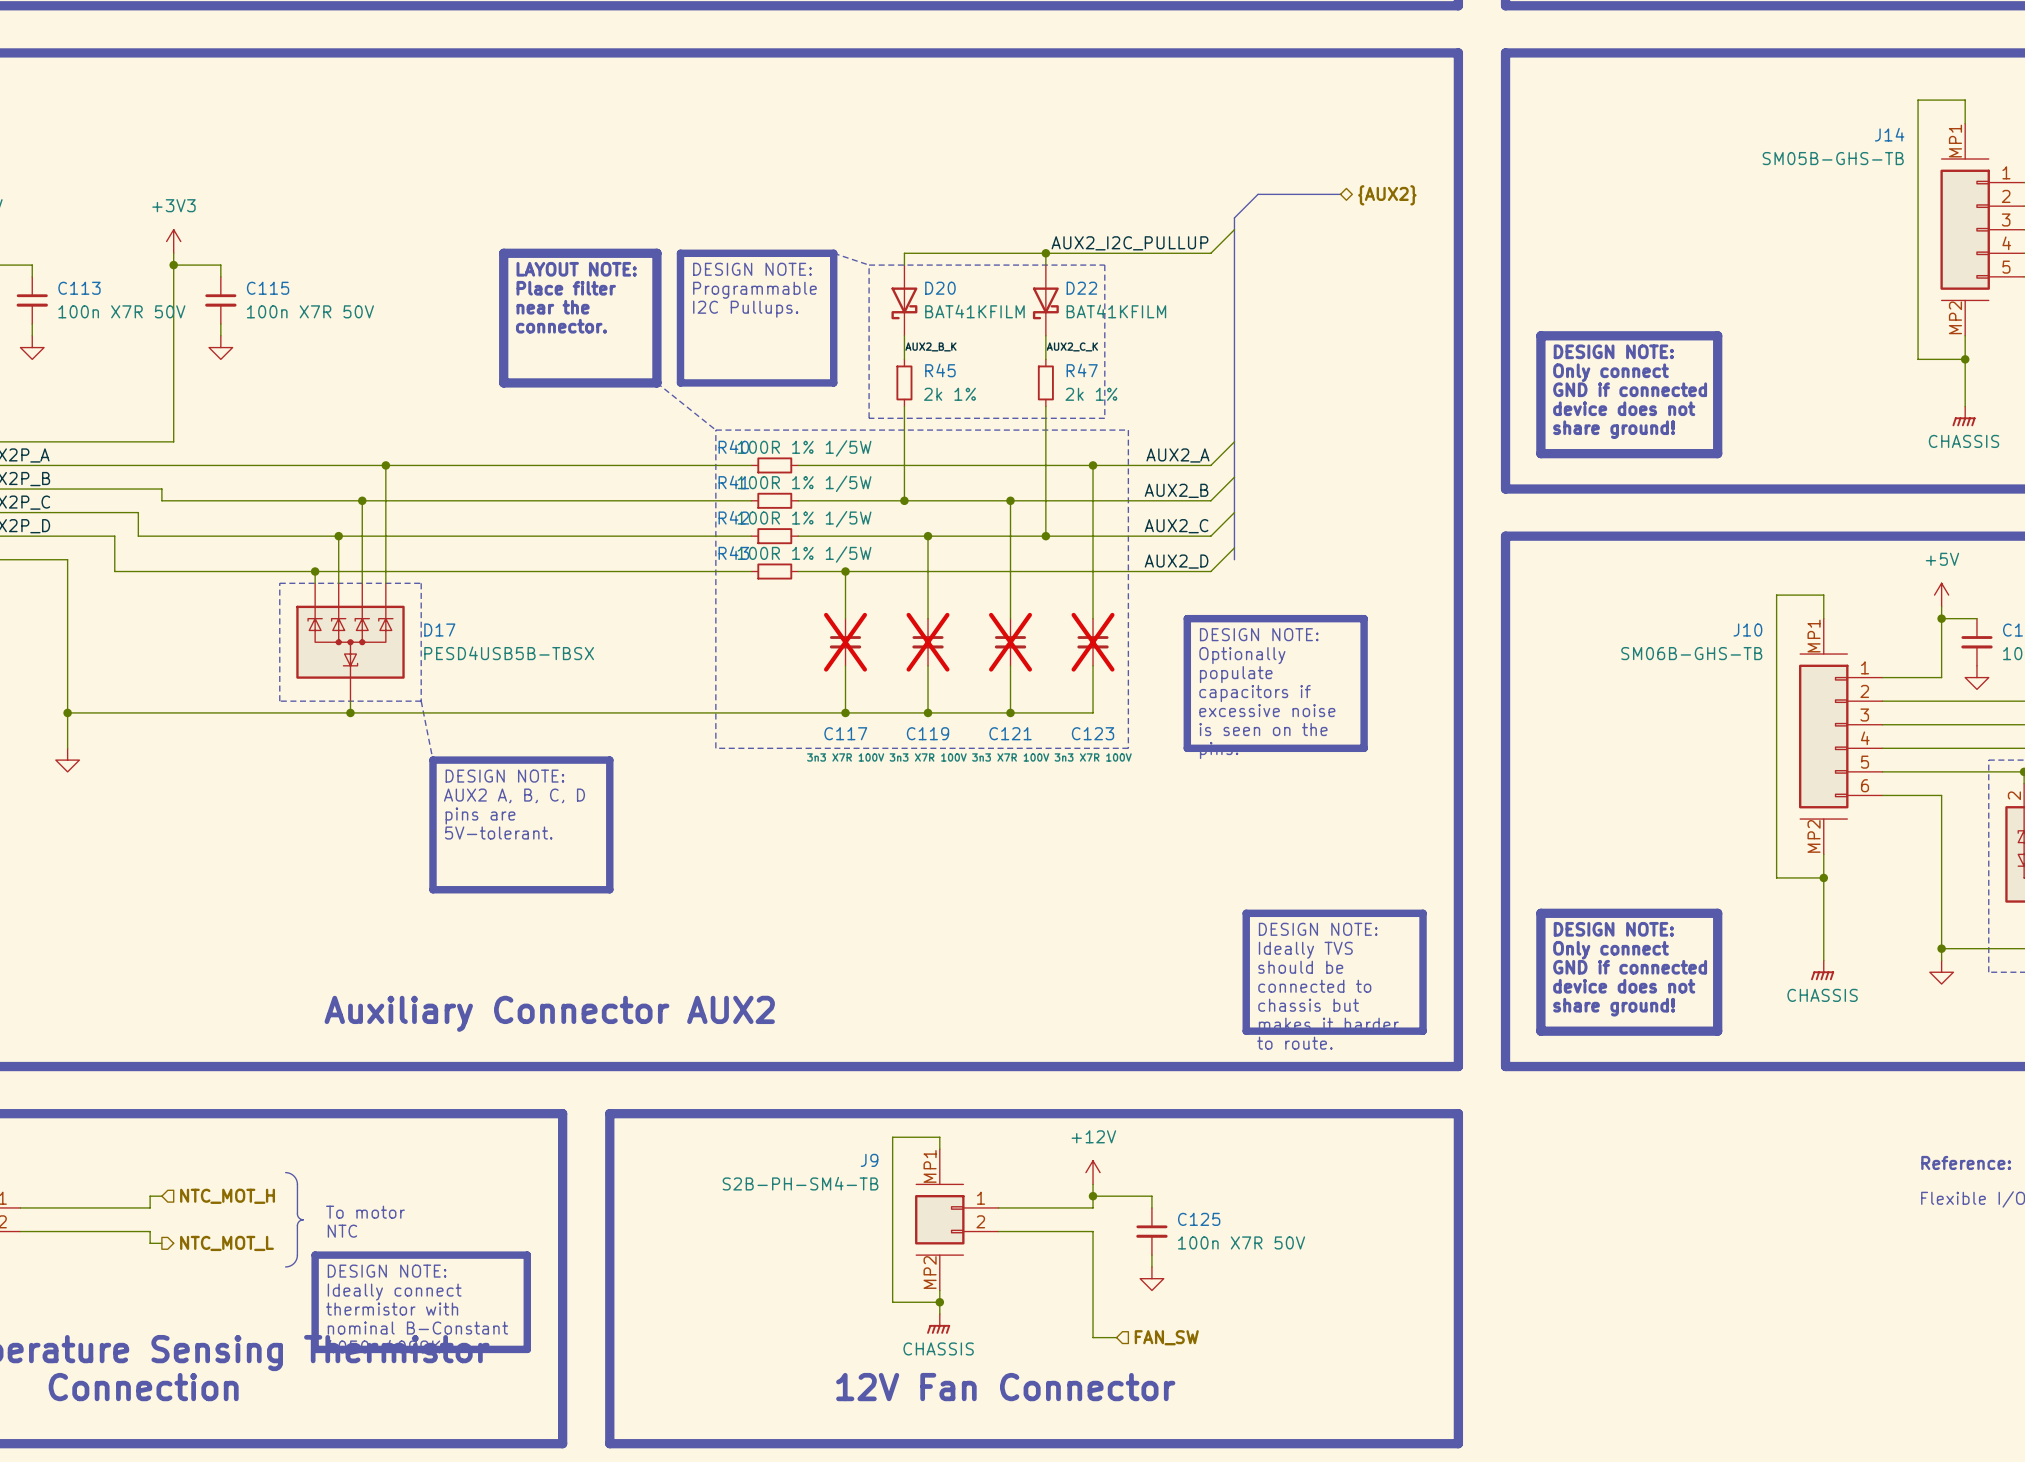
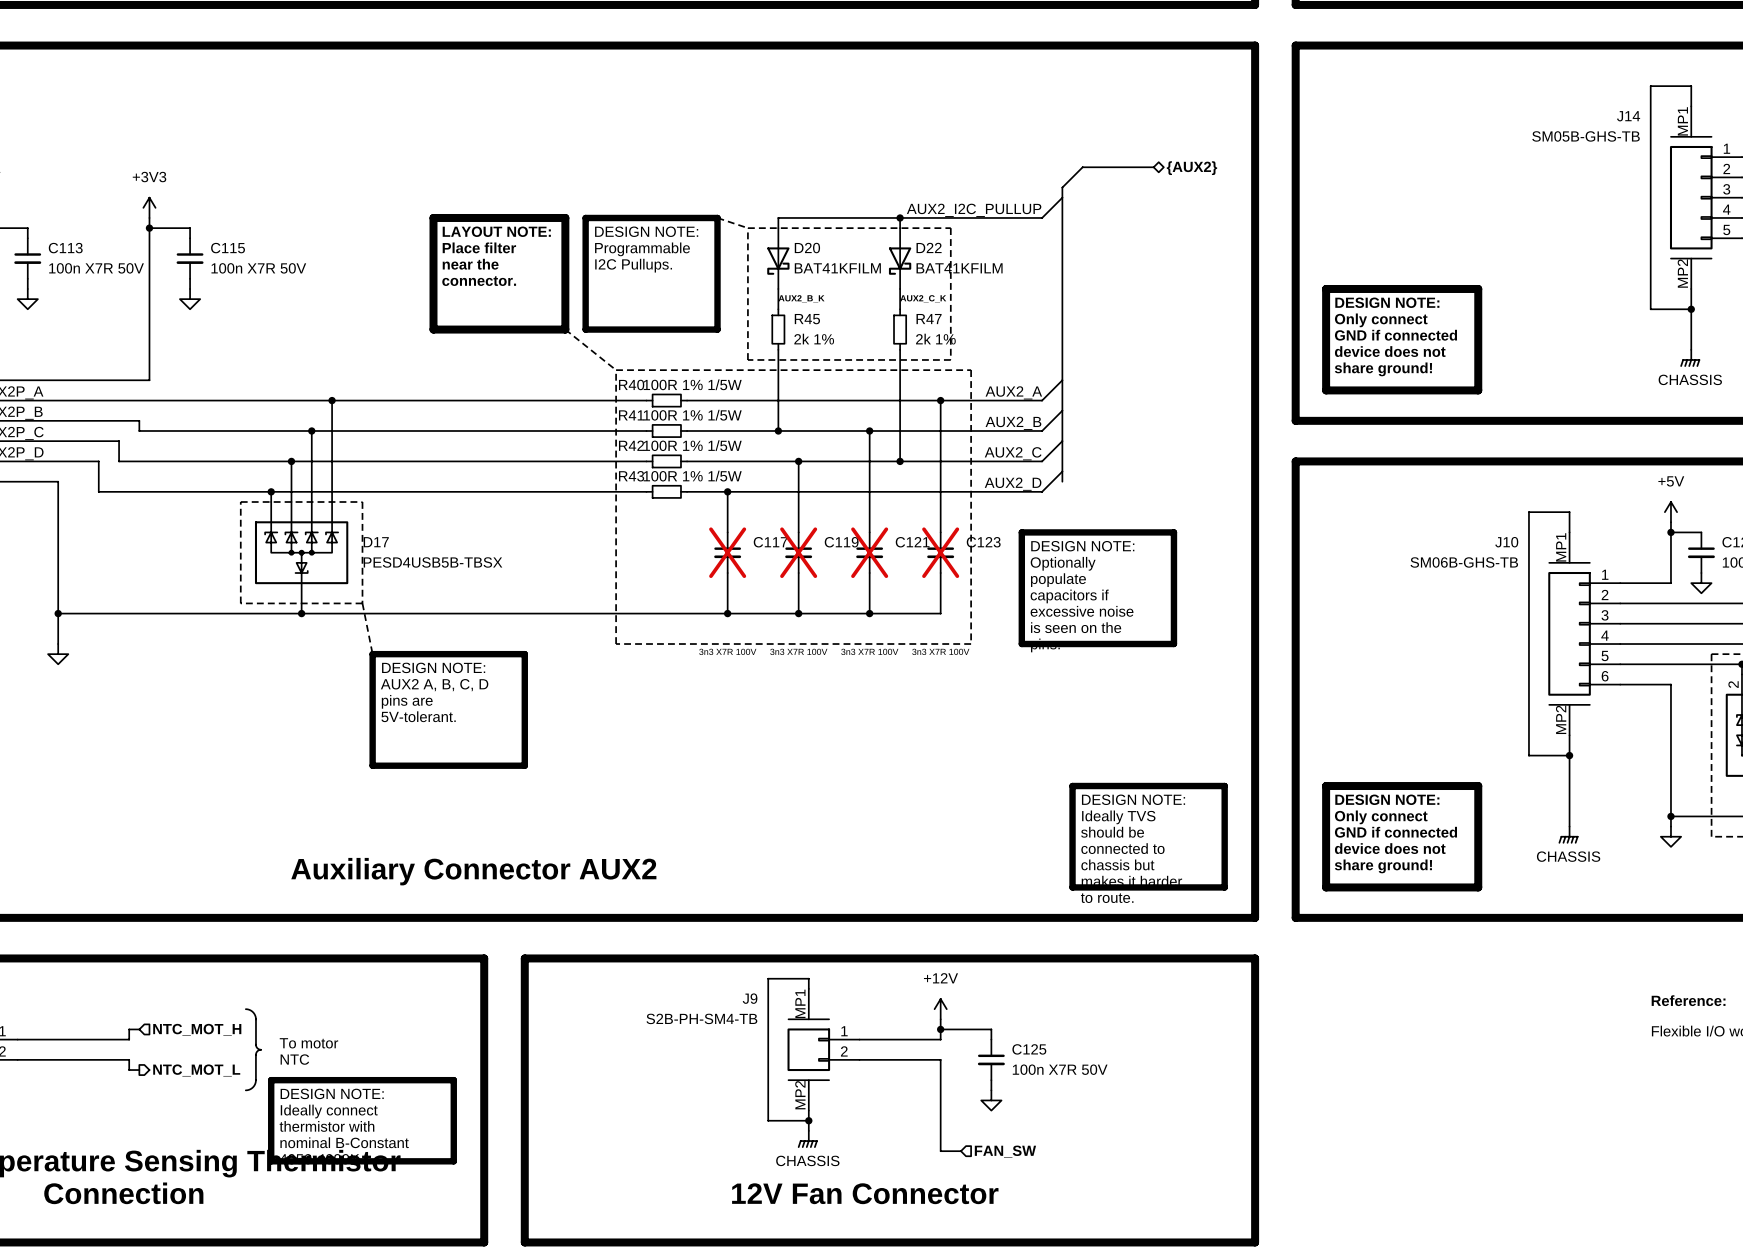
C117 name position: C117 (845, 733) -> C117 (770, 542)
C119 name position: C119 (928, 733) -> C119 (841, 542)
C121 name position: C121 (1010, 733) -> C121 (912, 542)
C123 name position: C123 (1093, 733) -> C123 (983, 542)

